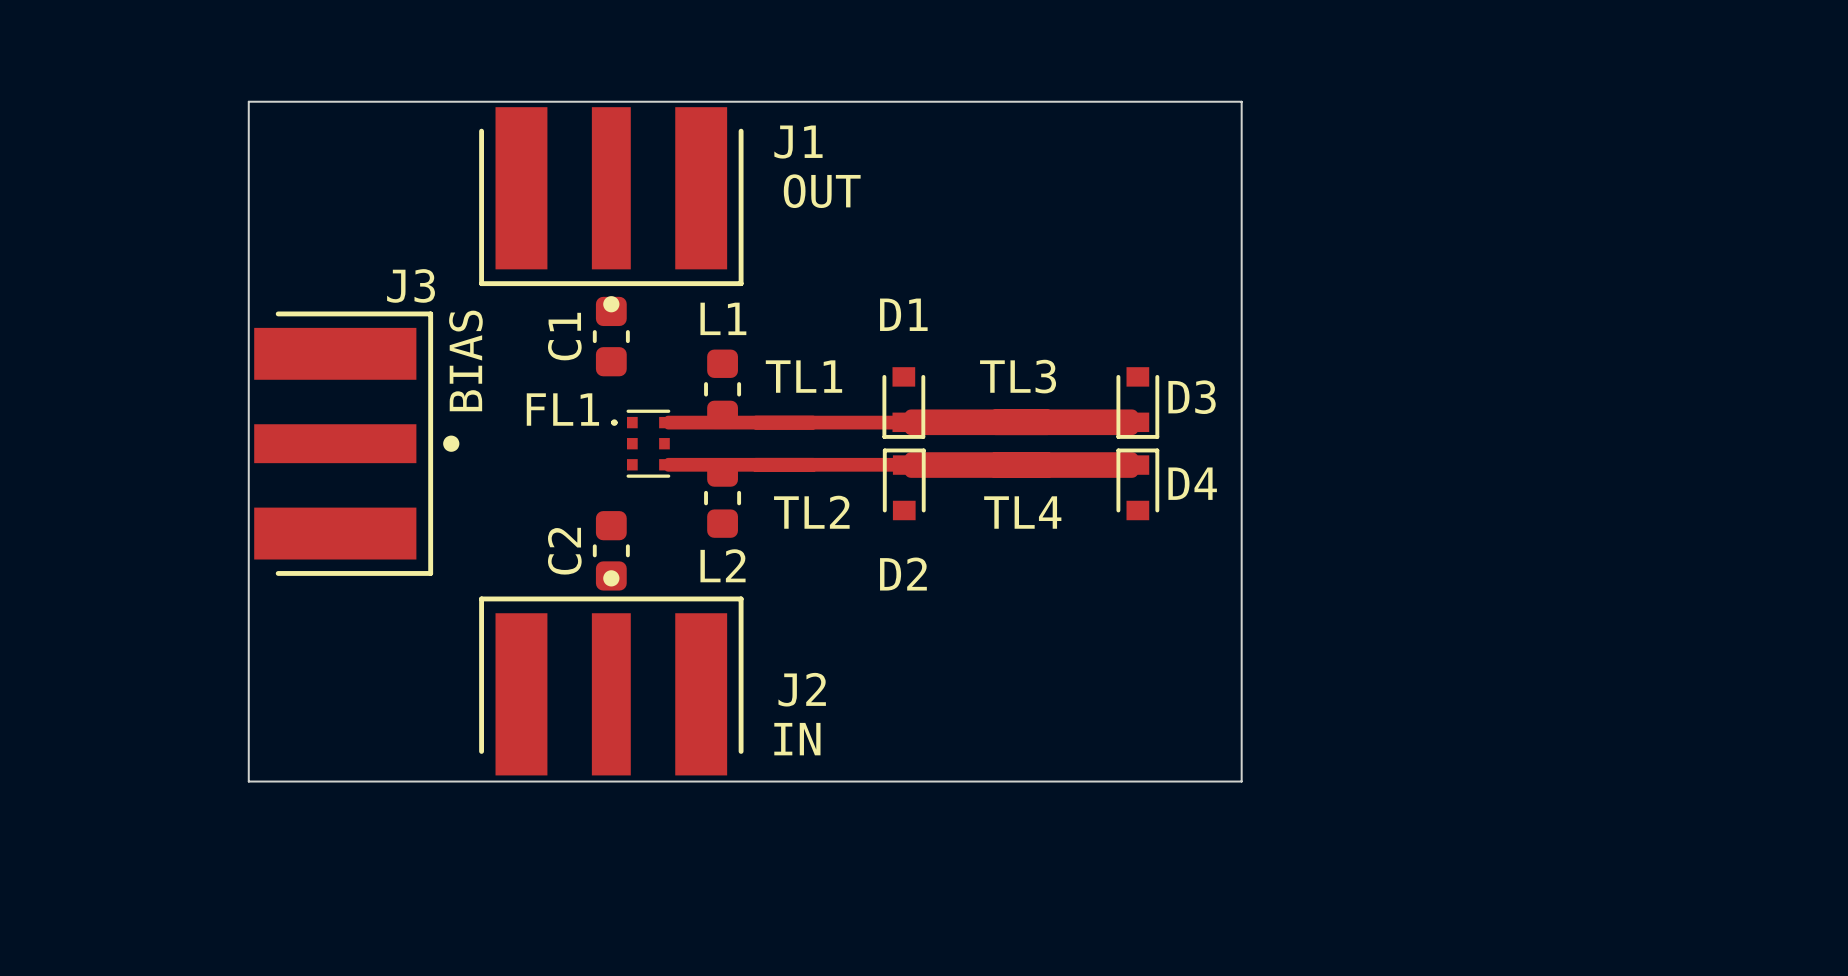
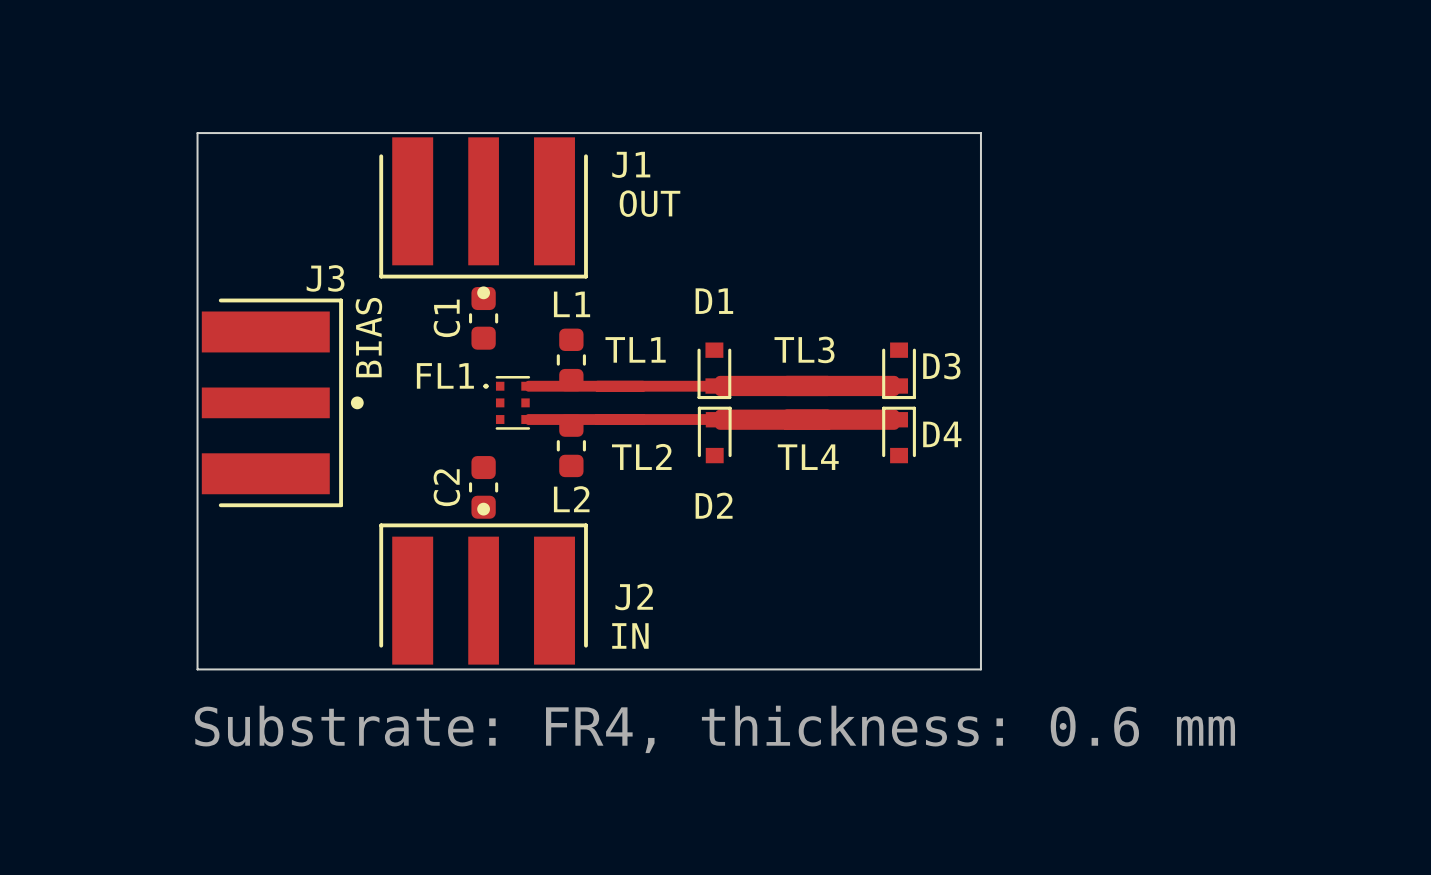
text: none -> Substrate: FR4, thickness: 0.6 mm (714, 729)

